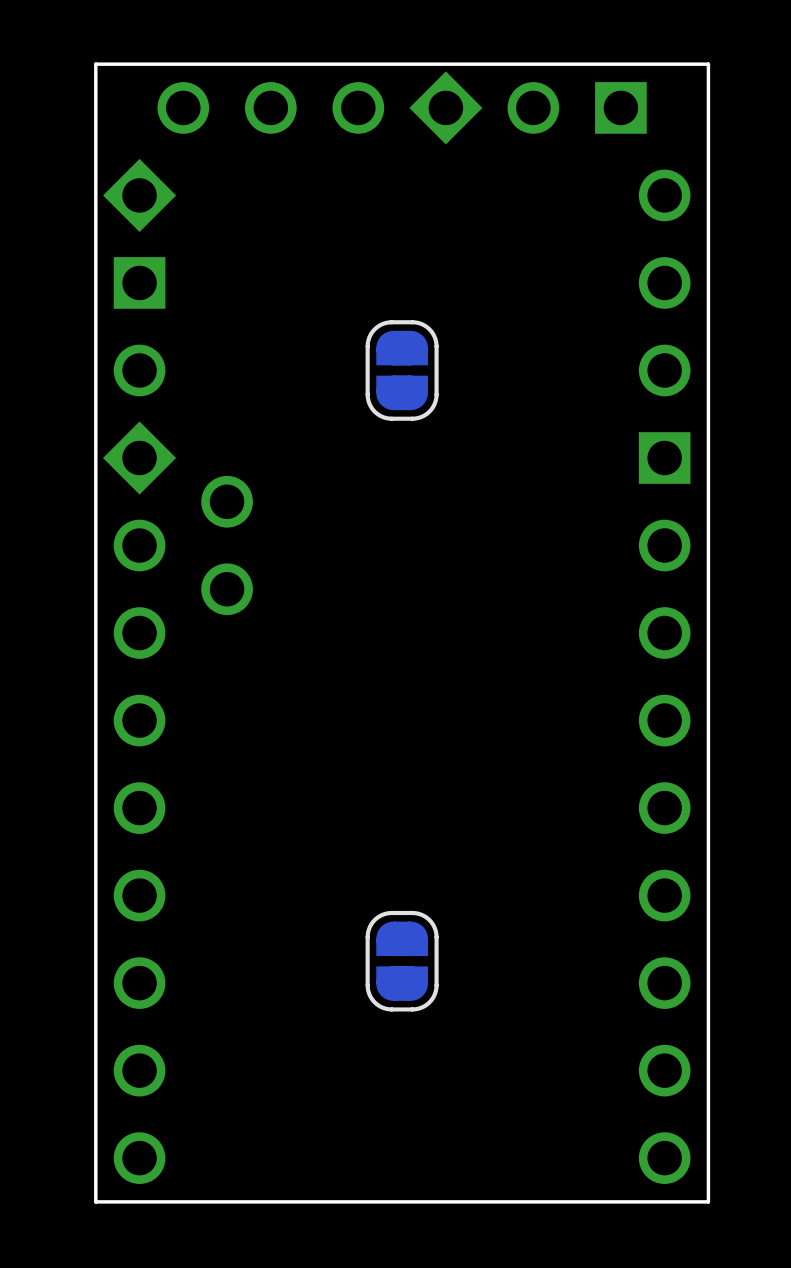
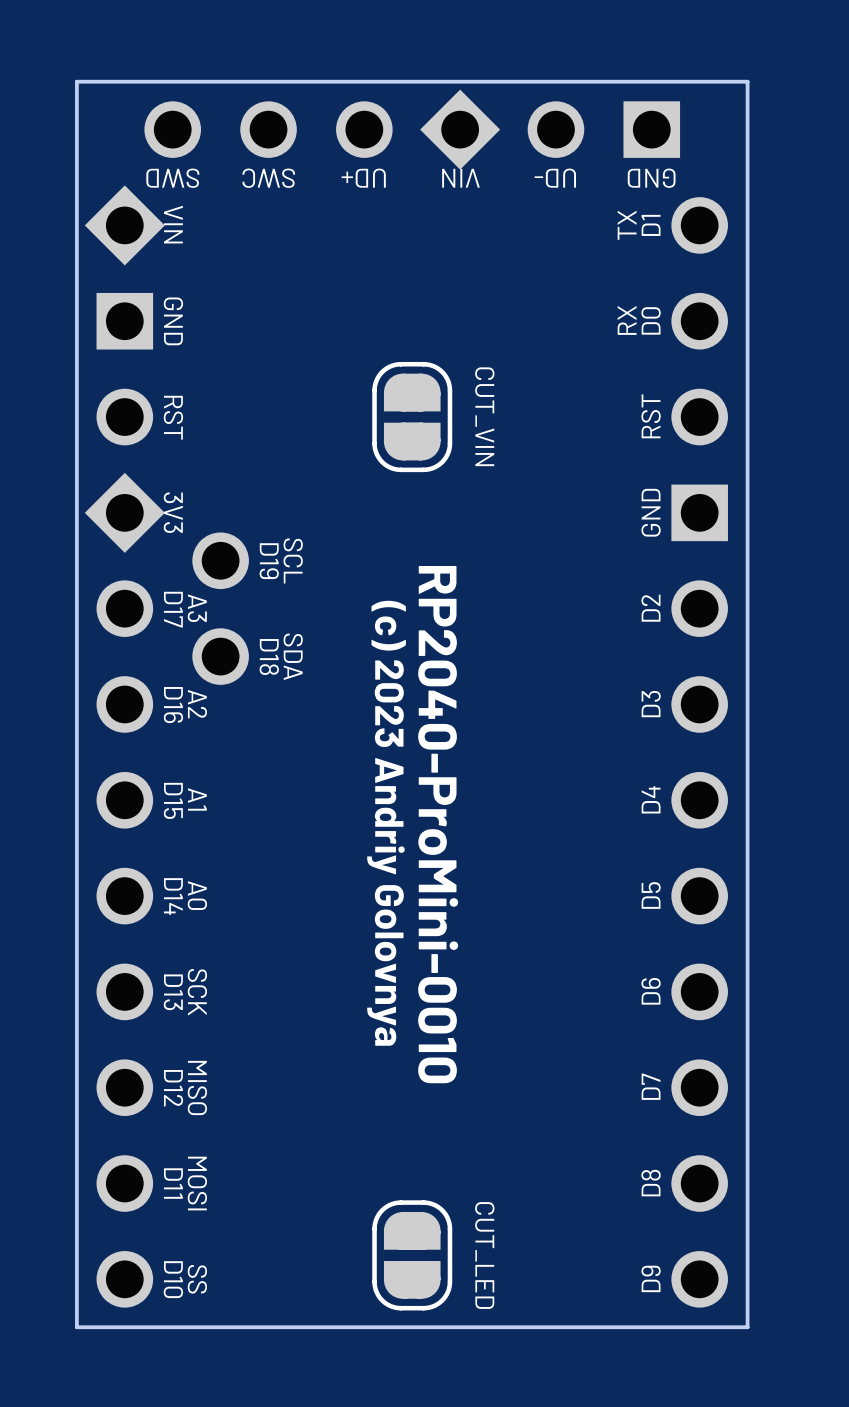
text: none -> SWD (172, 178)
text: none -> SWC (268, 178)
text: none -> UD+ (363, 178)
text: none -> VIN (460, 178)
text: none -> UD- (555, 178)
text: none -> GND (651, 178)
text: none -> VIN (173, 224)
text: none -> TX (627, 225)
text: none -> D1 (651, 225)
text: none -> RX (627, 320)
text: none -> GND (173, 321)
text: none -> D0 (651, 320)
text: none -> CUT_VIN (484, 416)
text: none -> RST (173, 417)
text: none -> RST (651, 416)
text: none -> 3V3 (173, 512)
text: none -> GND (651, 512)
text: none -> D19 (269, 561)
text: none -> SCL (293, 560)
text: none -> A3 (197, 608)
text: none -> D17 (173, 609)
text: none -> D2 (650, 608)
text: none -> D18 (269, 657)
text: none -> SDA (293, 656)
text: none -> A2 (197, 704)
text: none -> D16 (173, 705)
text: none -> D3 (651, 704)
text: none -> A1 (197, 799)
text: none -> D15 (173, 800)
text: none -> D4 (651, 799)
text: none -> RP2040-ProMini-0010 (438, 824)
text: none -> (c) 2023 Andriy Golovnya (386, 823)
text: none -> D14 (173, 896)
text: none -> A0 (197, 895)
text: none -> D5 (651, 895)
text: none -> D13 (173, 992)
text: none -> SCK (197, 992)
text: none -> D6 (651, 991)
part position: (402, 961) -> (412, 1255)
text: none -> D12 (173, 1088)
text: none -> MISO (197, 1088)
text: none -> D7 (651, 1086)
text: none -> D11 (173, 1183)
text: none -> MOSI (197, 1183)
text: none -> D8 (651, 1183)
text: none -> CUT_LED (484, 1255)
text: none -> D10 (173, 1279)
text: none -> SS (197, 1279)
text: none -> D9 (651, 1278)

